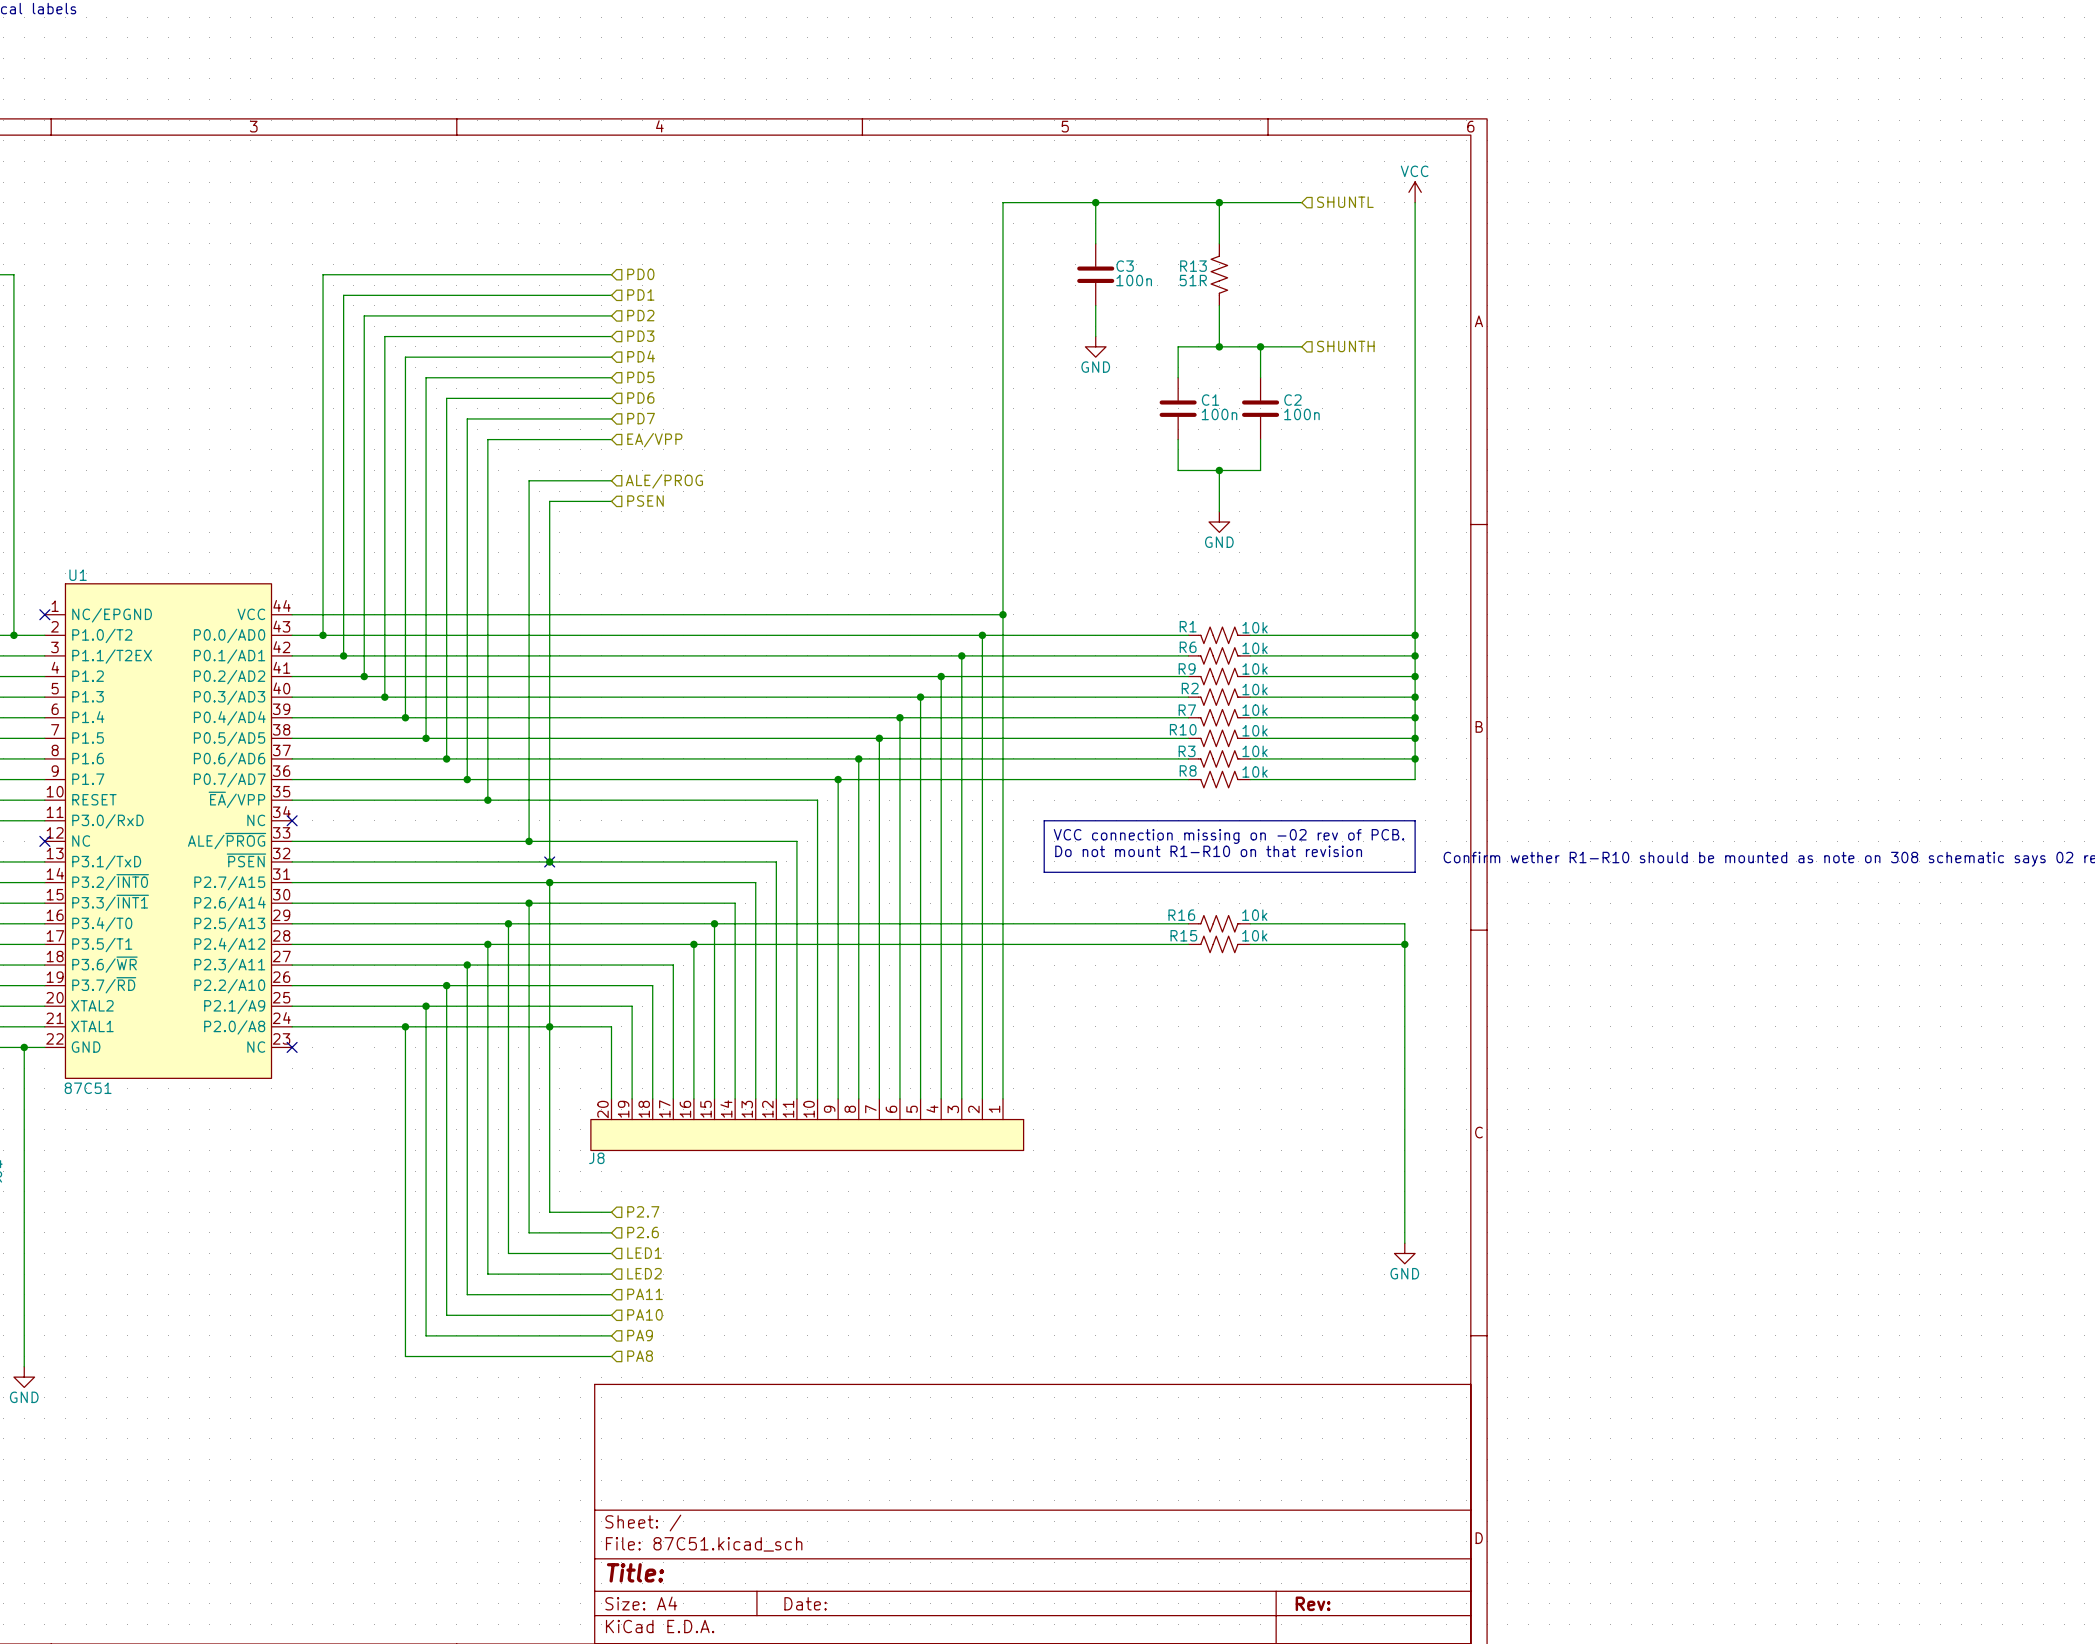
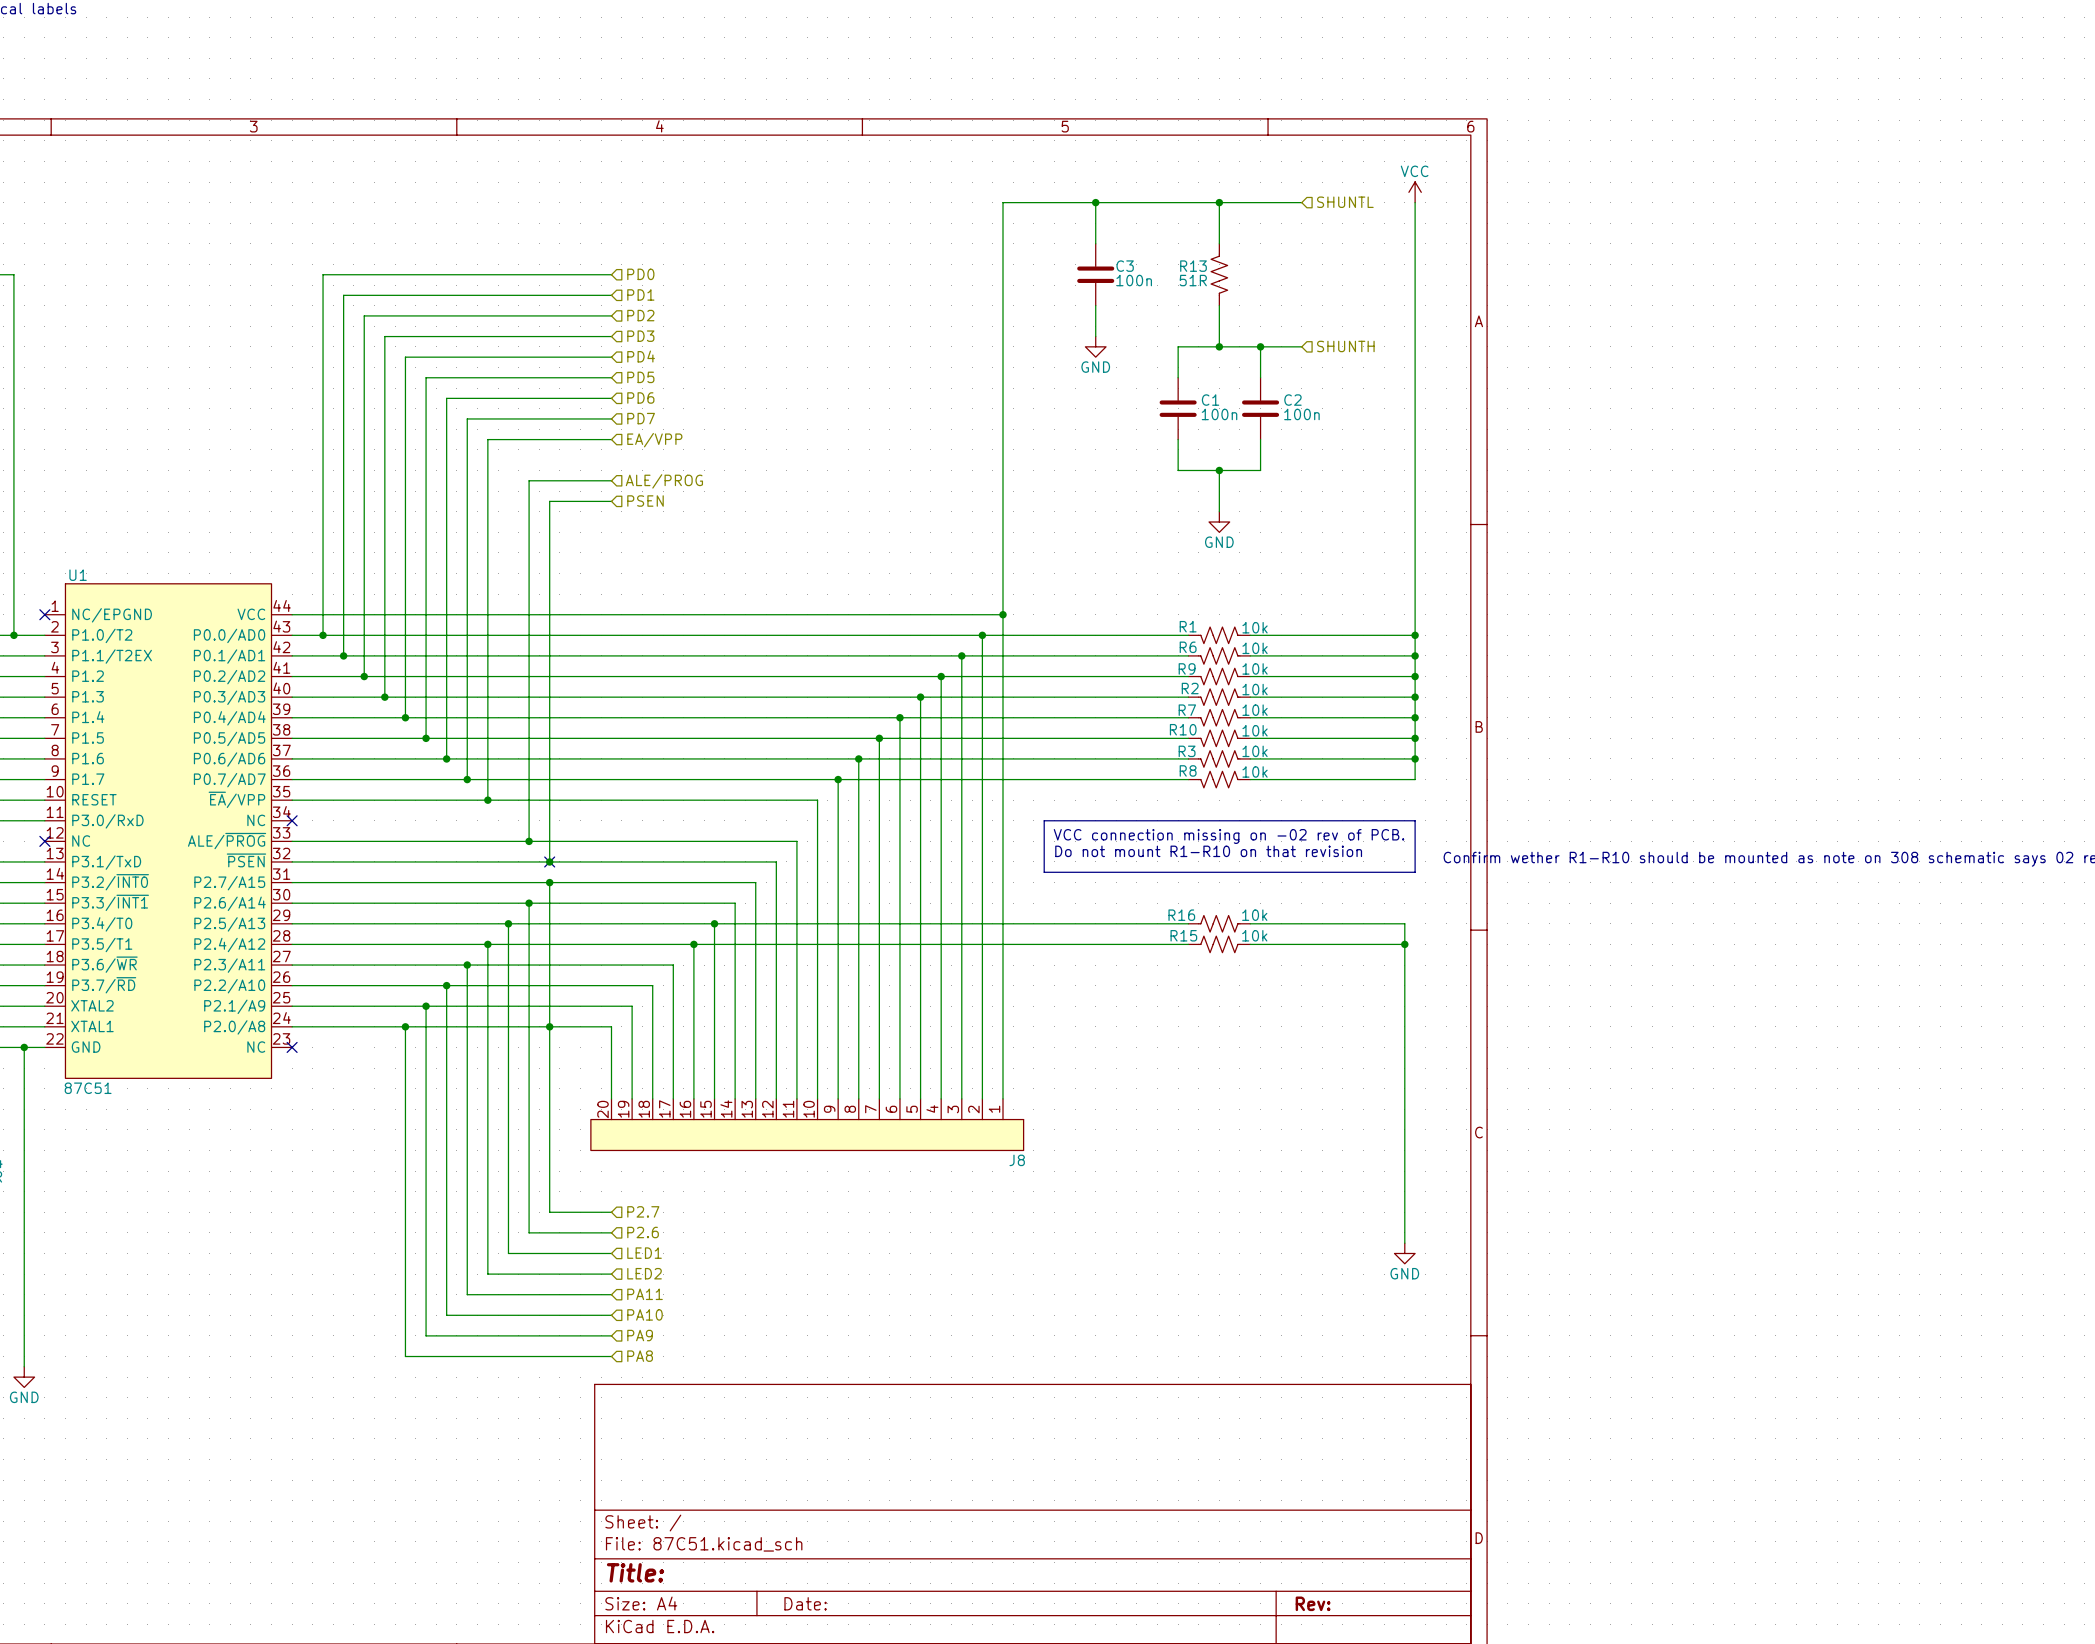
J8 name position: J8 (596, 1158) -> J8 (1017, 1160)

